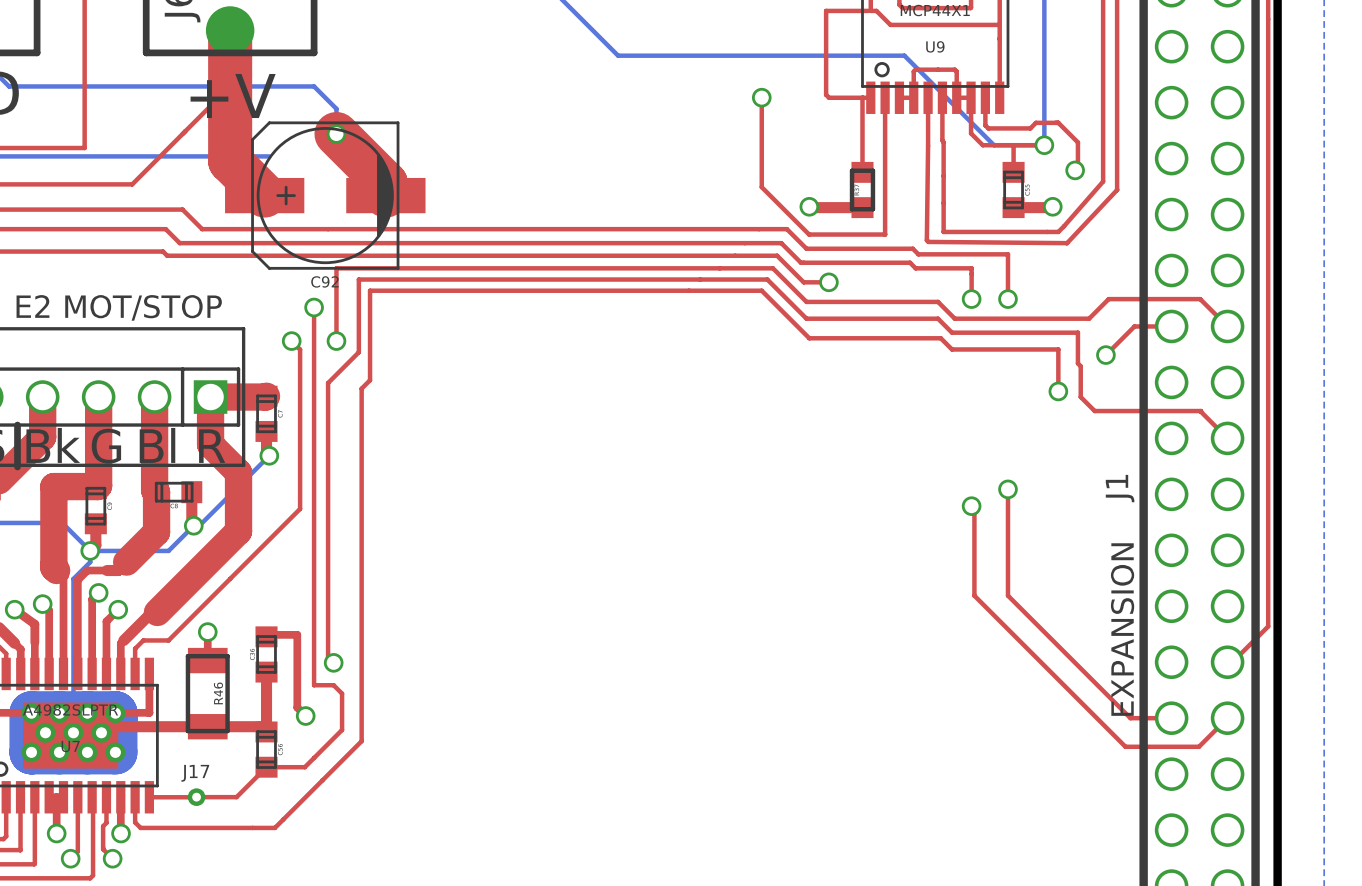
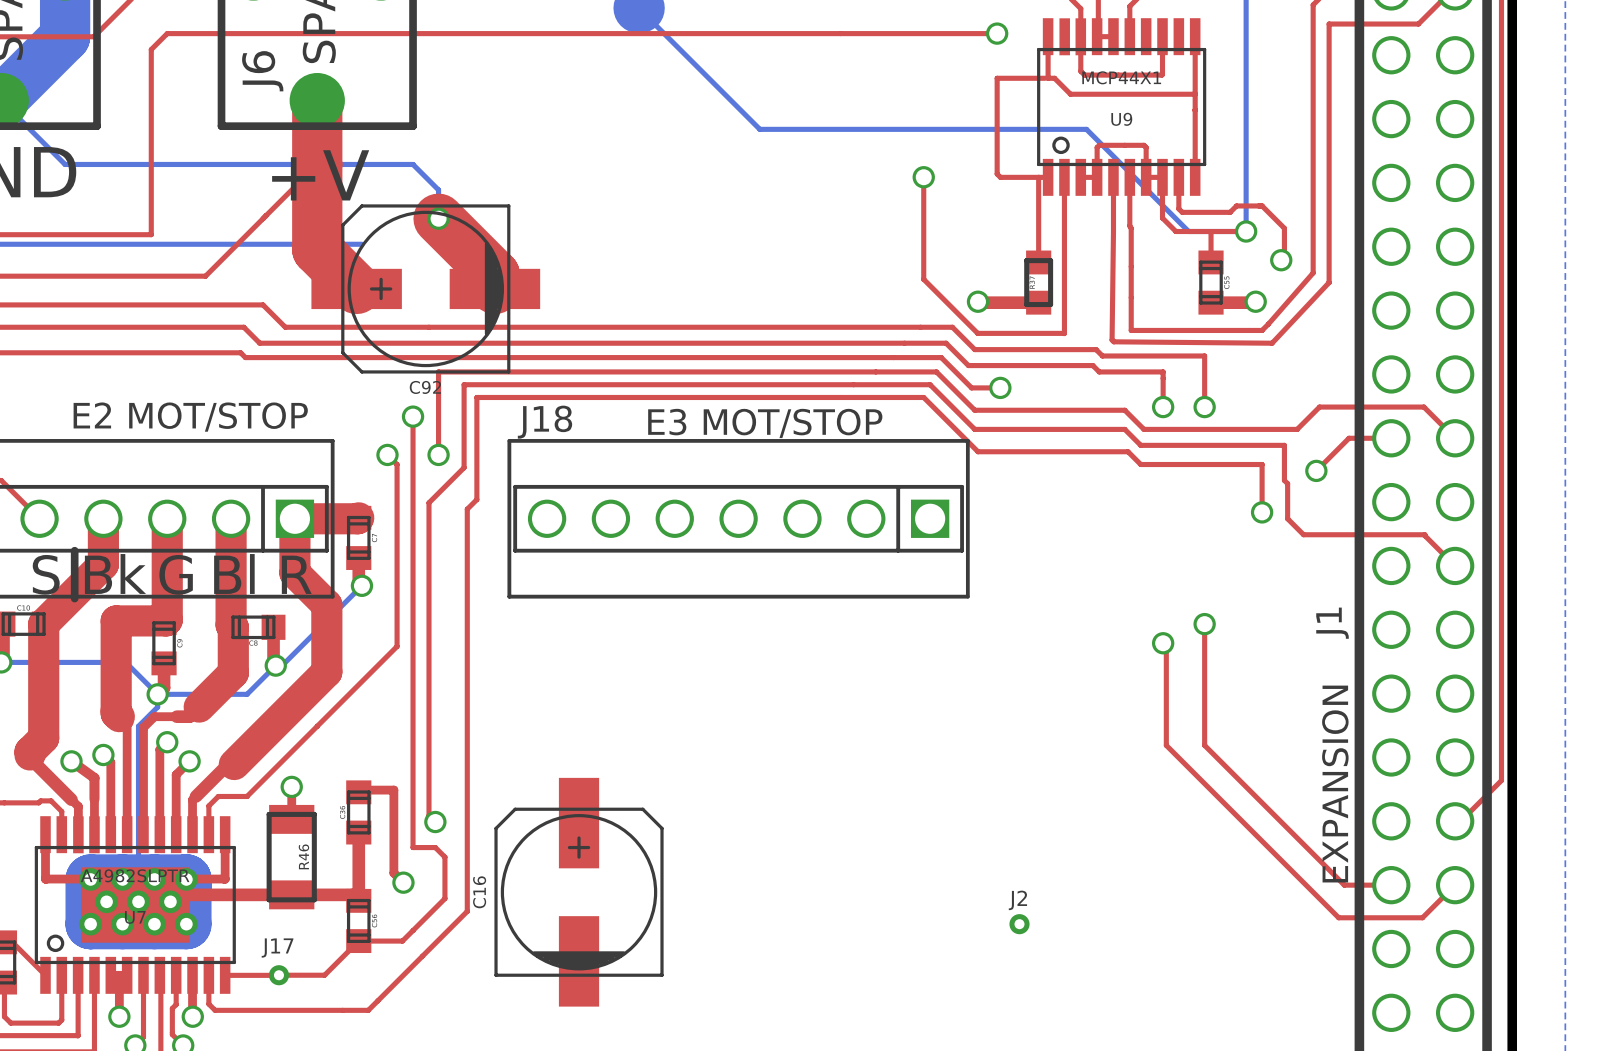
J18: none -> E3 MOT/STOP (738, 518)
C16: none -> (579, 892)
J2: none -> (1019, 924)

